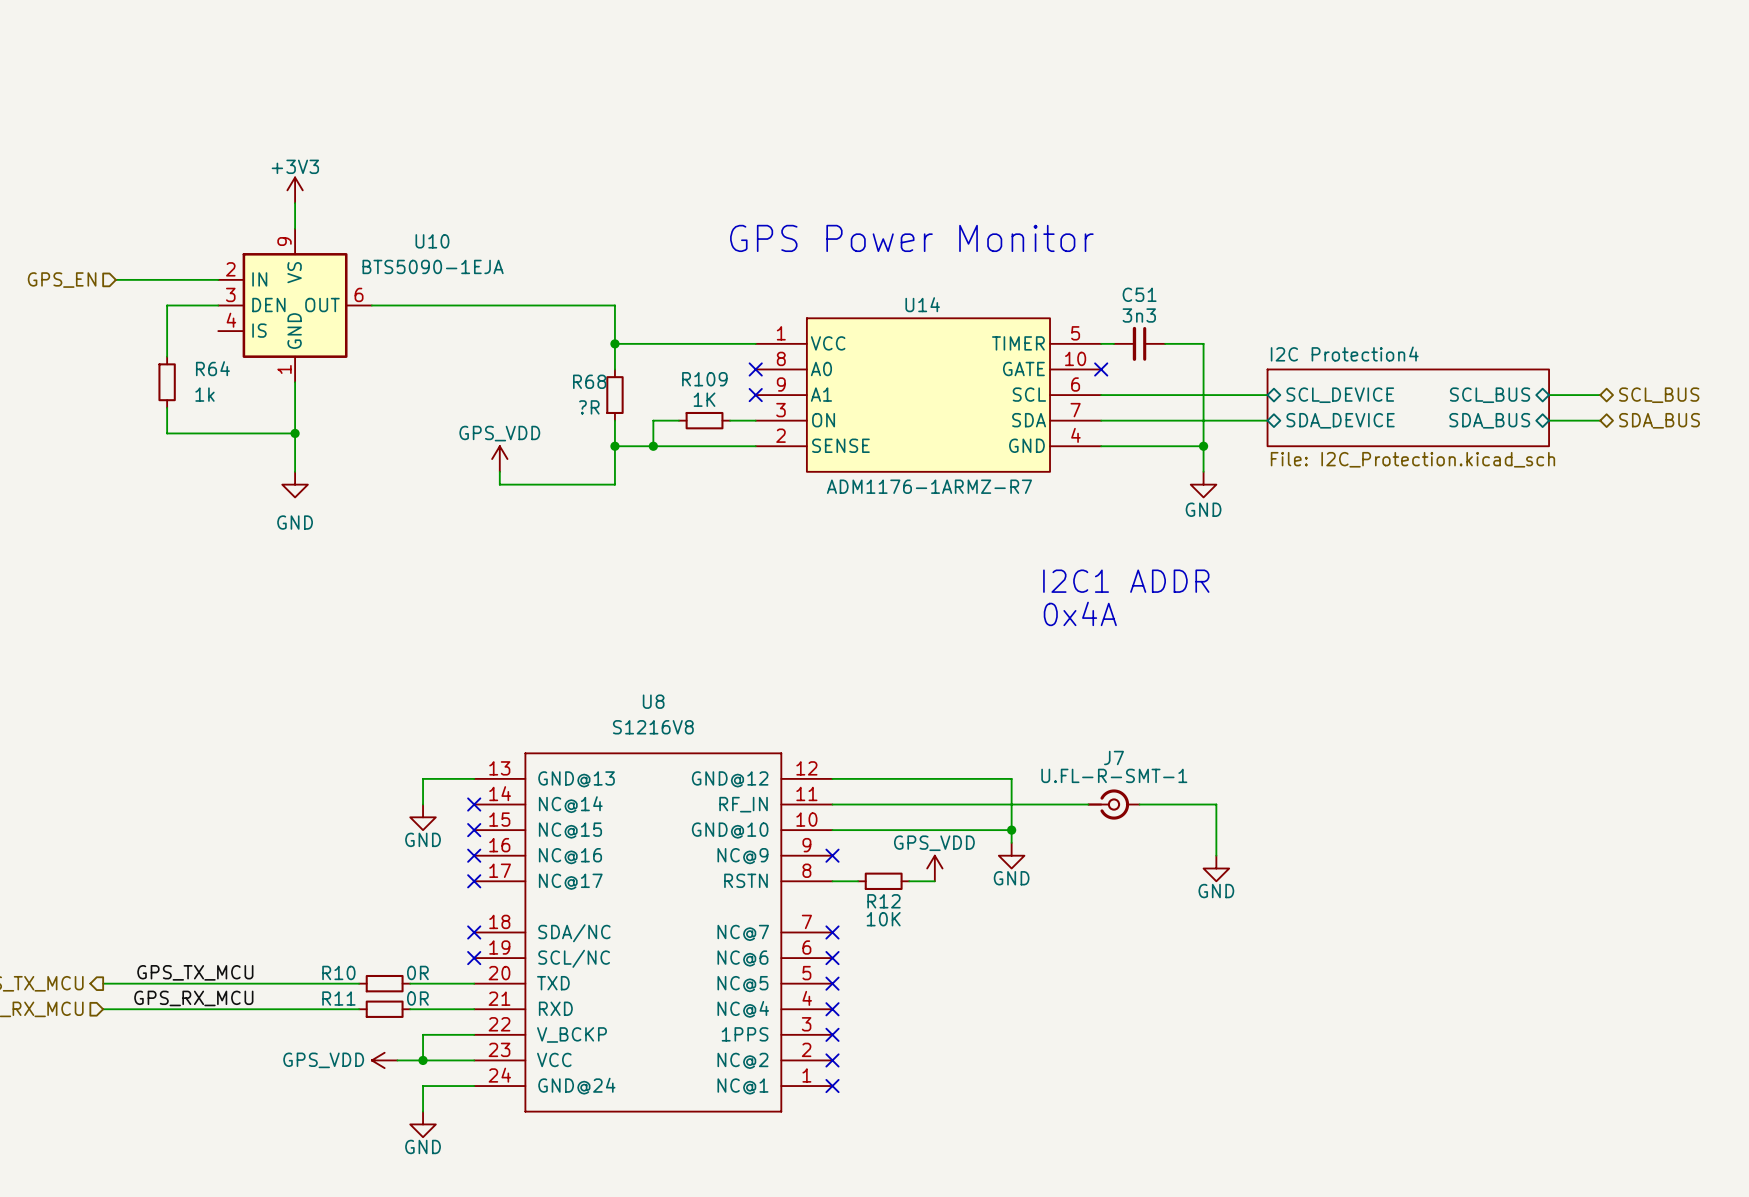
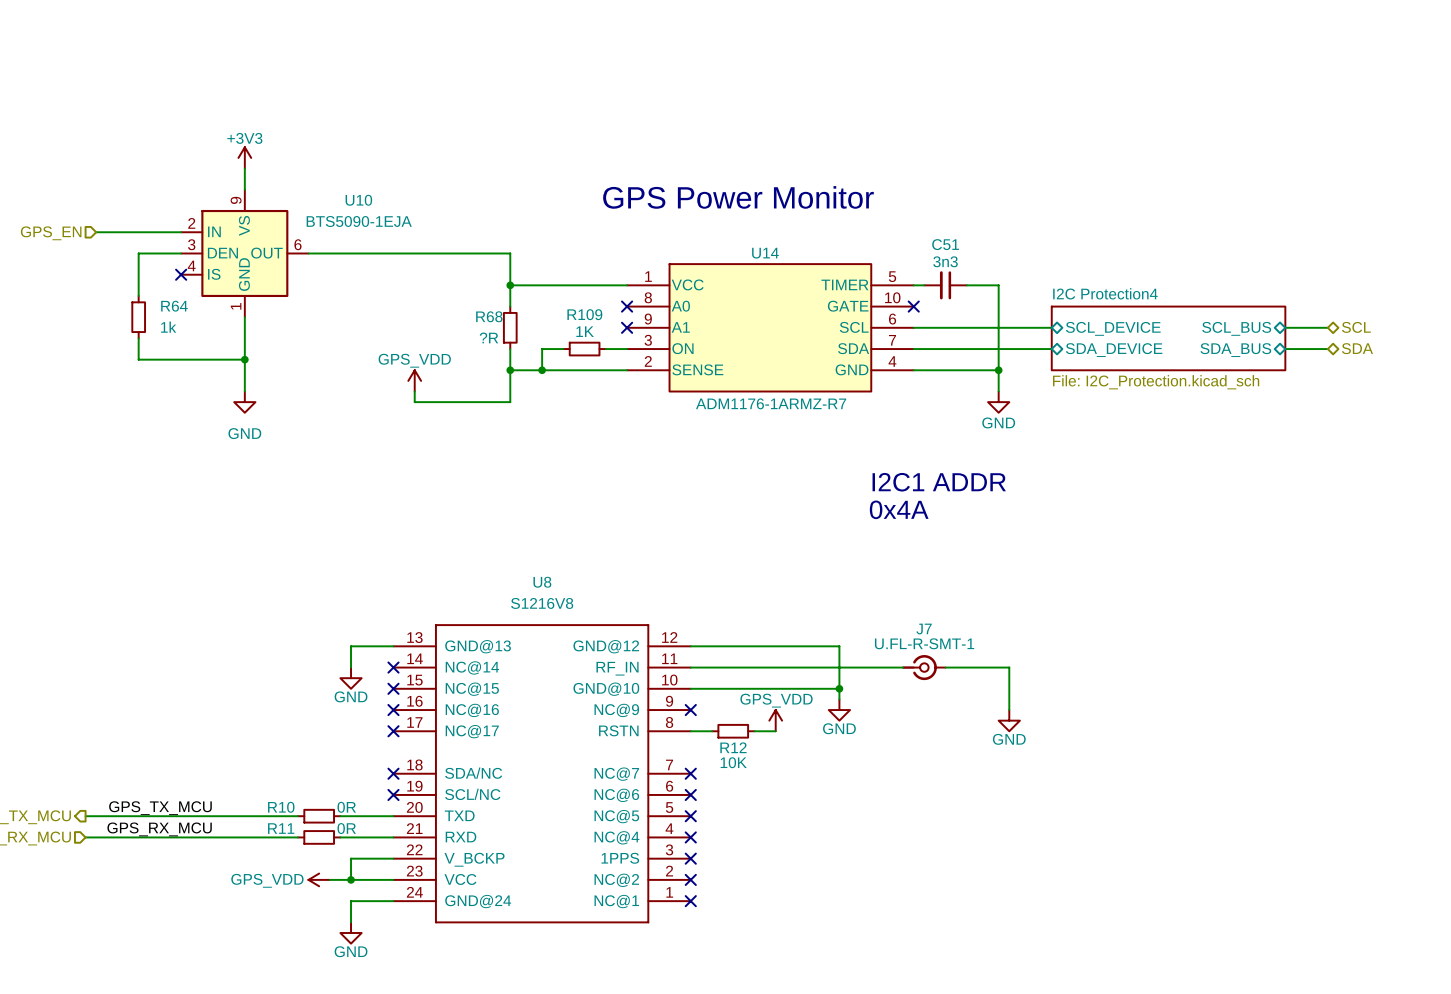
no-connect mark: none -> (181, 274)
hierarchical label: SCL_BUS (1659, 395) -> SCL (1356, 327)
hierarchical label: SDA_BUS (1659, 420) -> SDA (1357, 348)

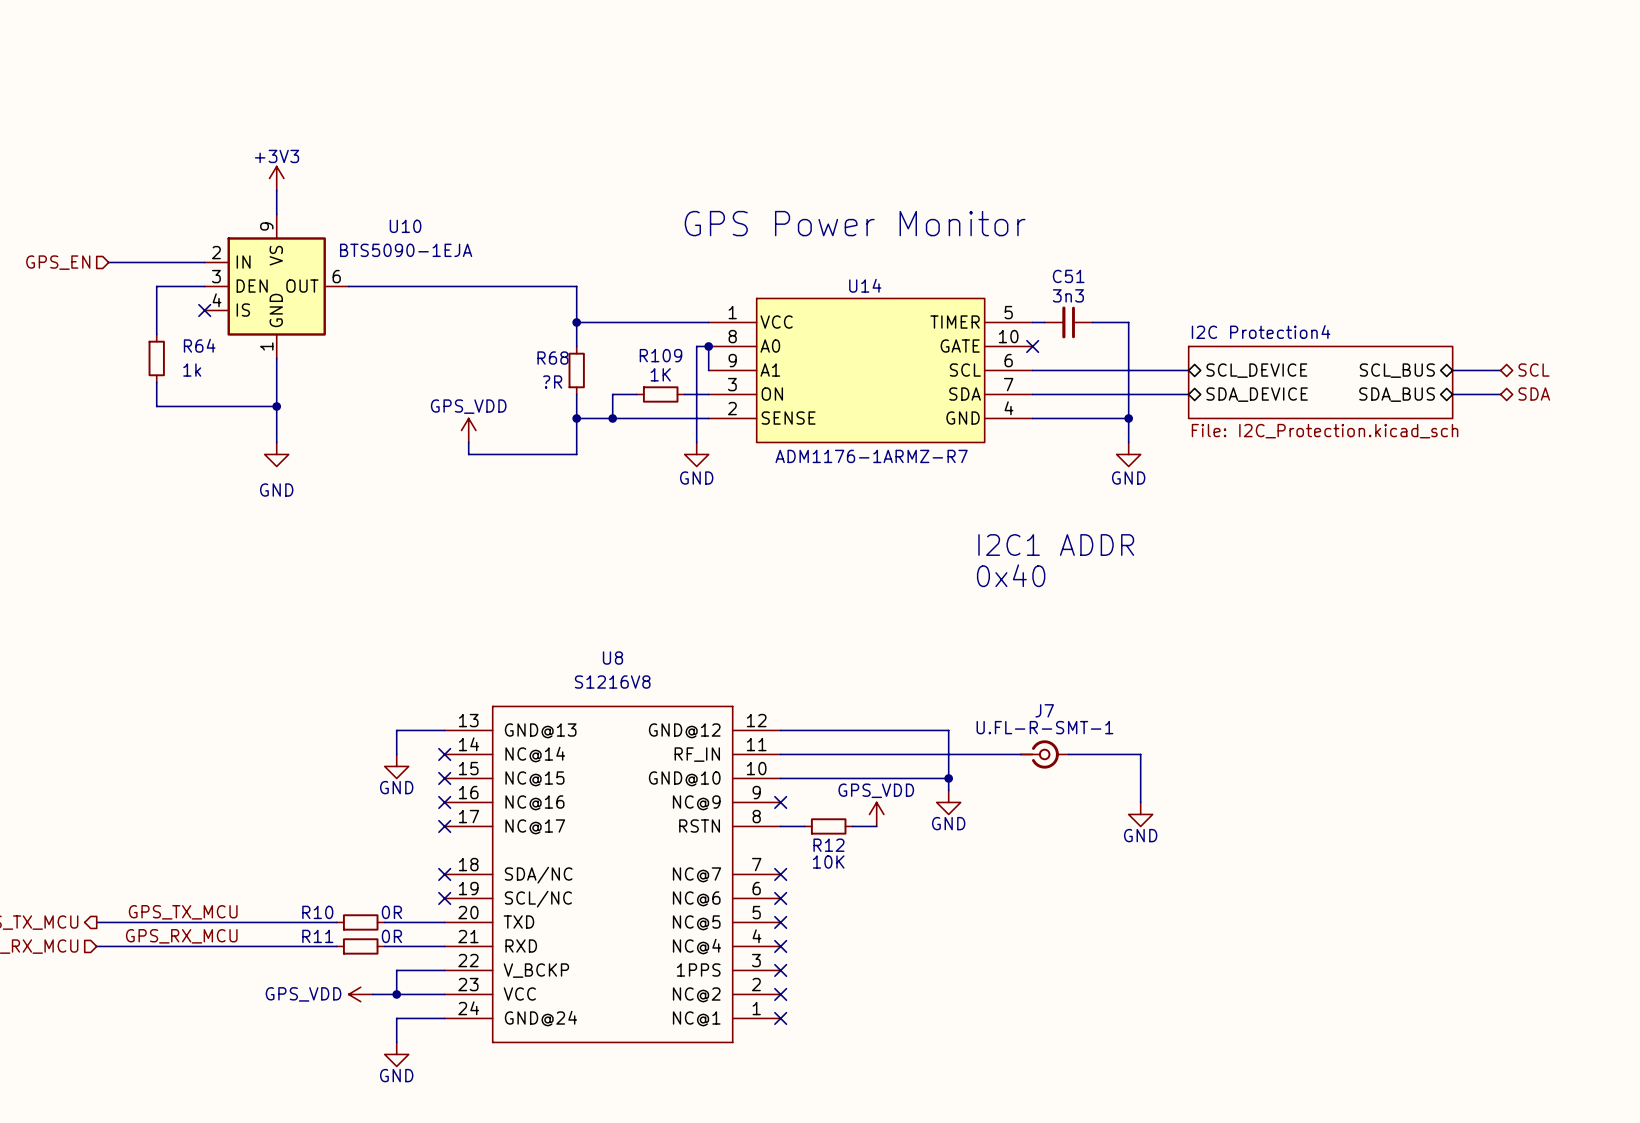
no-connect mark: (627, 306) -> none
junction: none -> (708, 346)
wire: none -> (708, 370) (708, 346) (696, 346) (696, 442)
no-connect mark: (627, 327) -> none
power symbol: none -> GND (696, 454)
text: 0x4A (899, 509) -> 0x40 (1011, 575)

